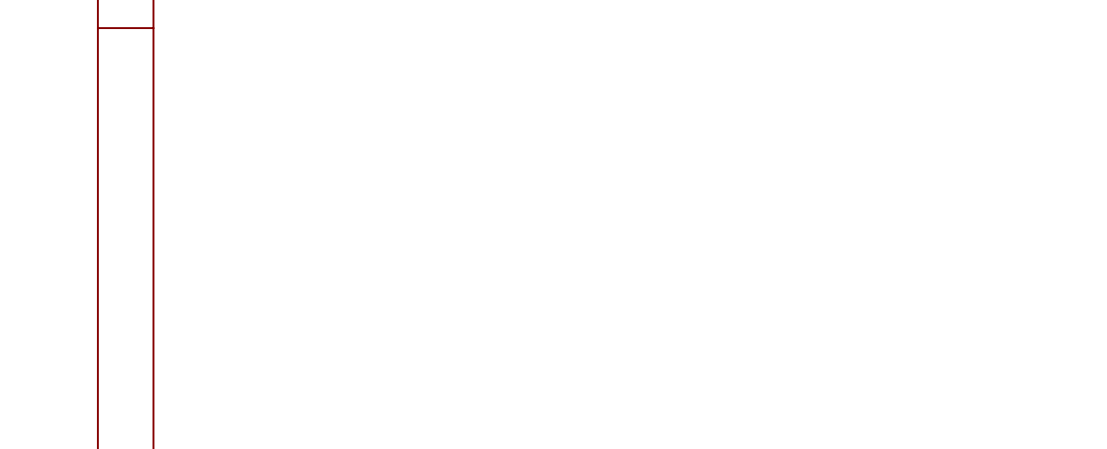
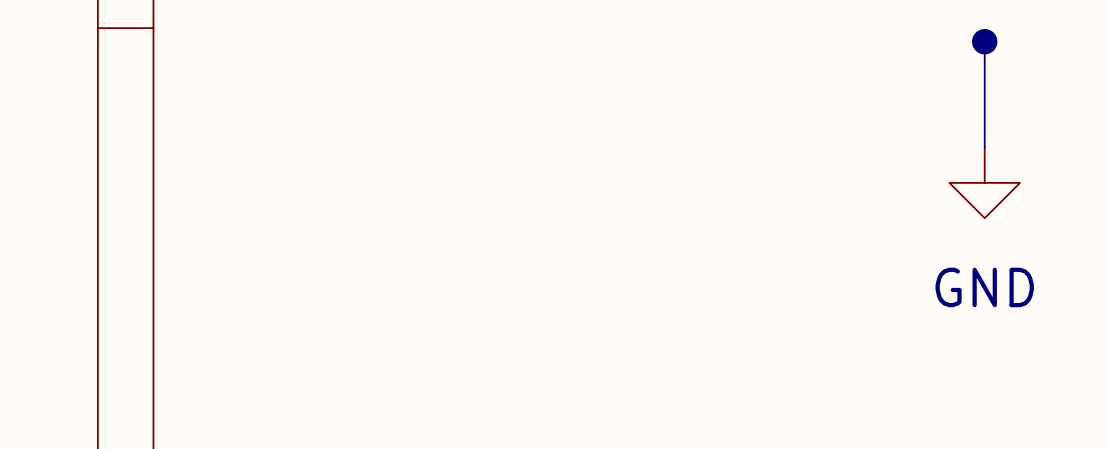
wire: none -> (984, 41) (984, 147)
junction: none -> (984, 41)
power symbol: none -> GND (984, 182)

